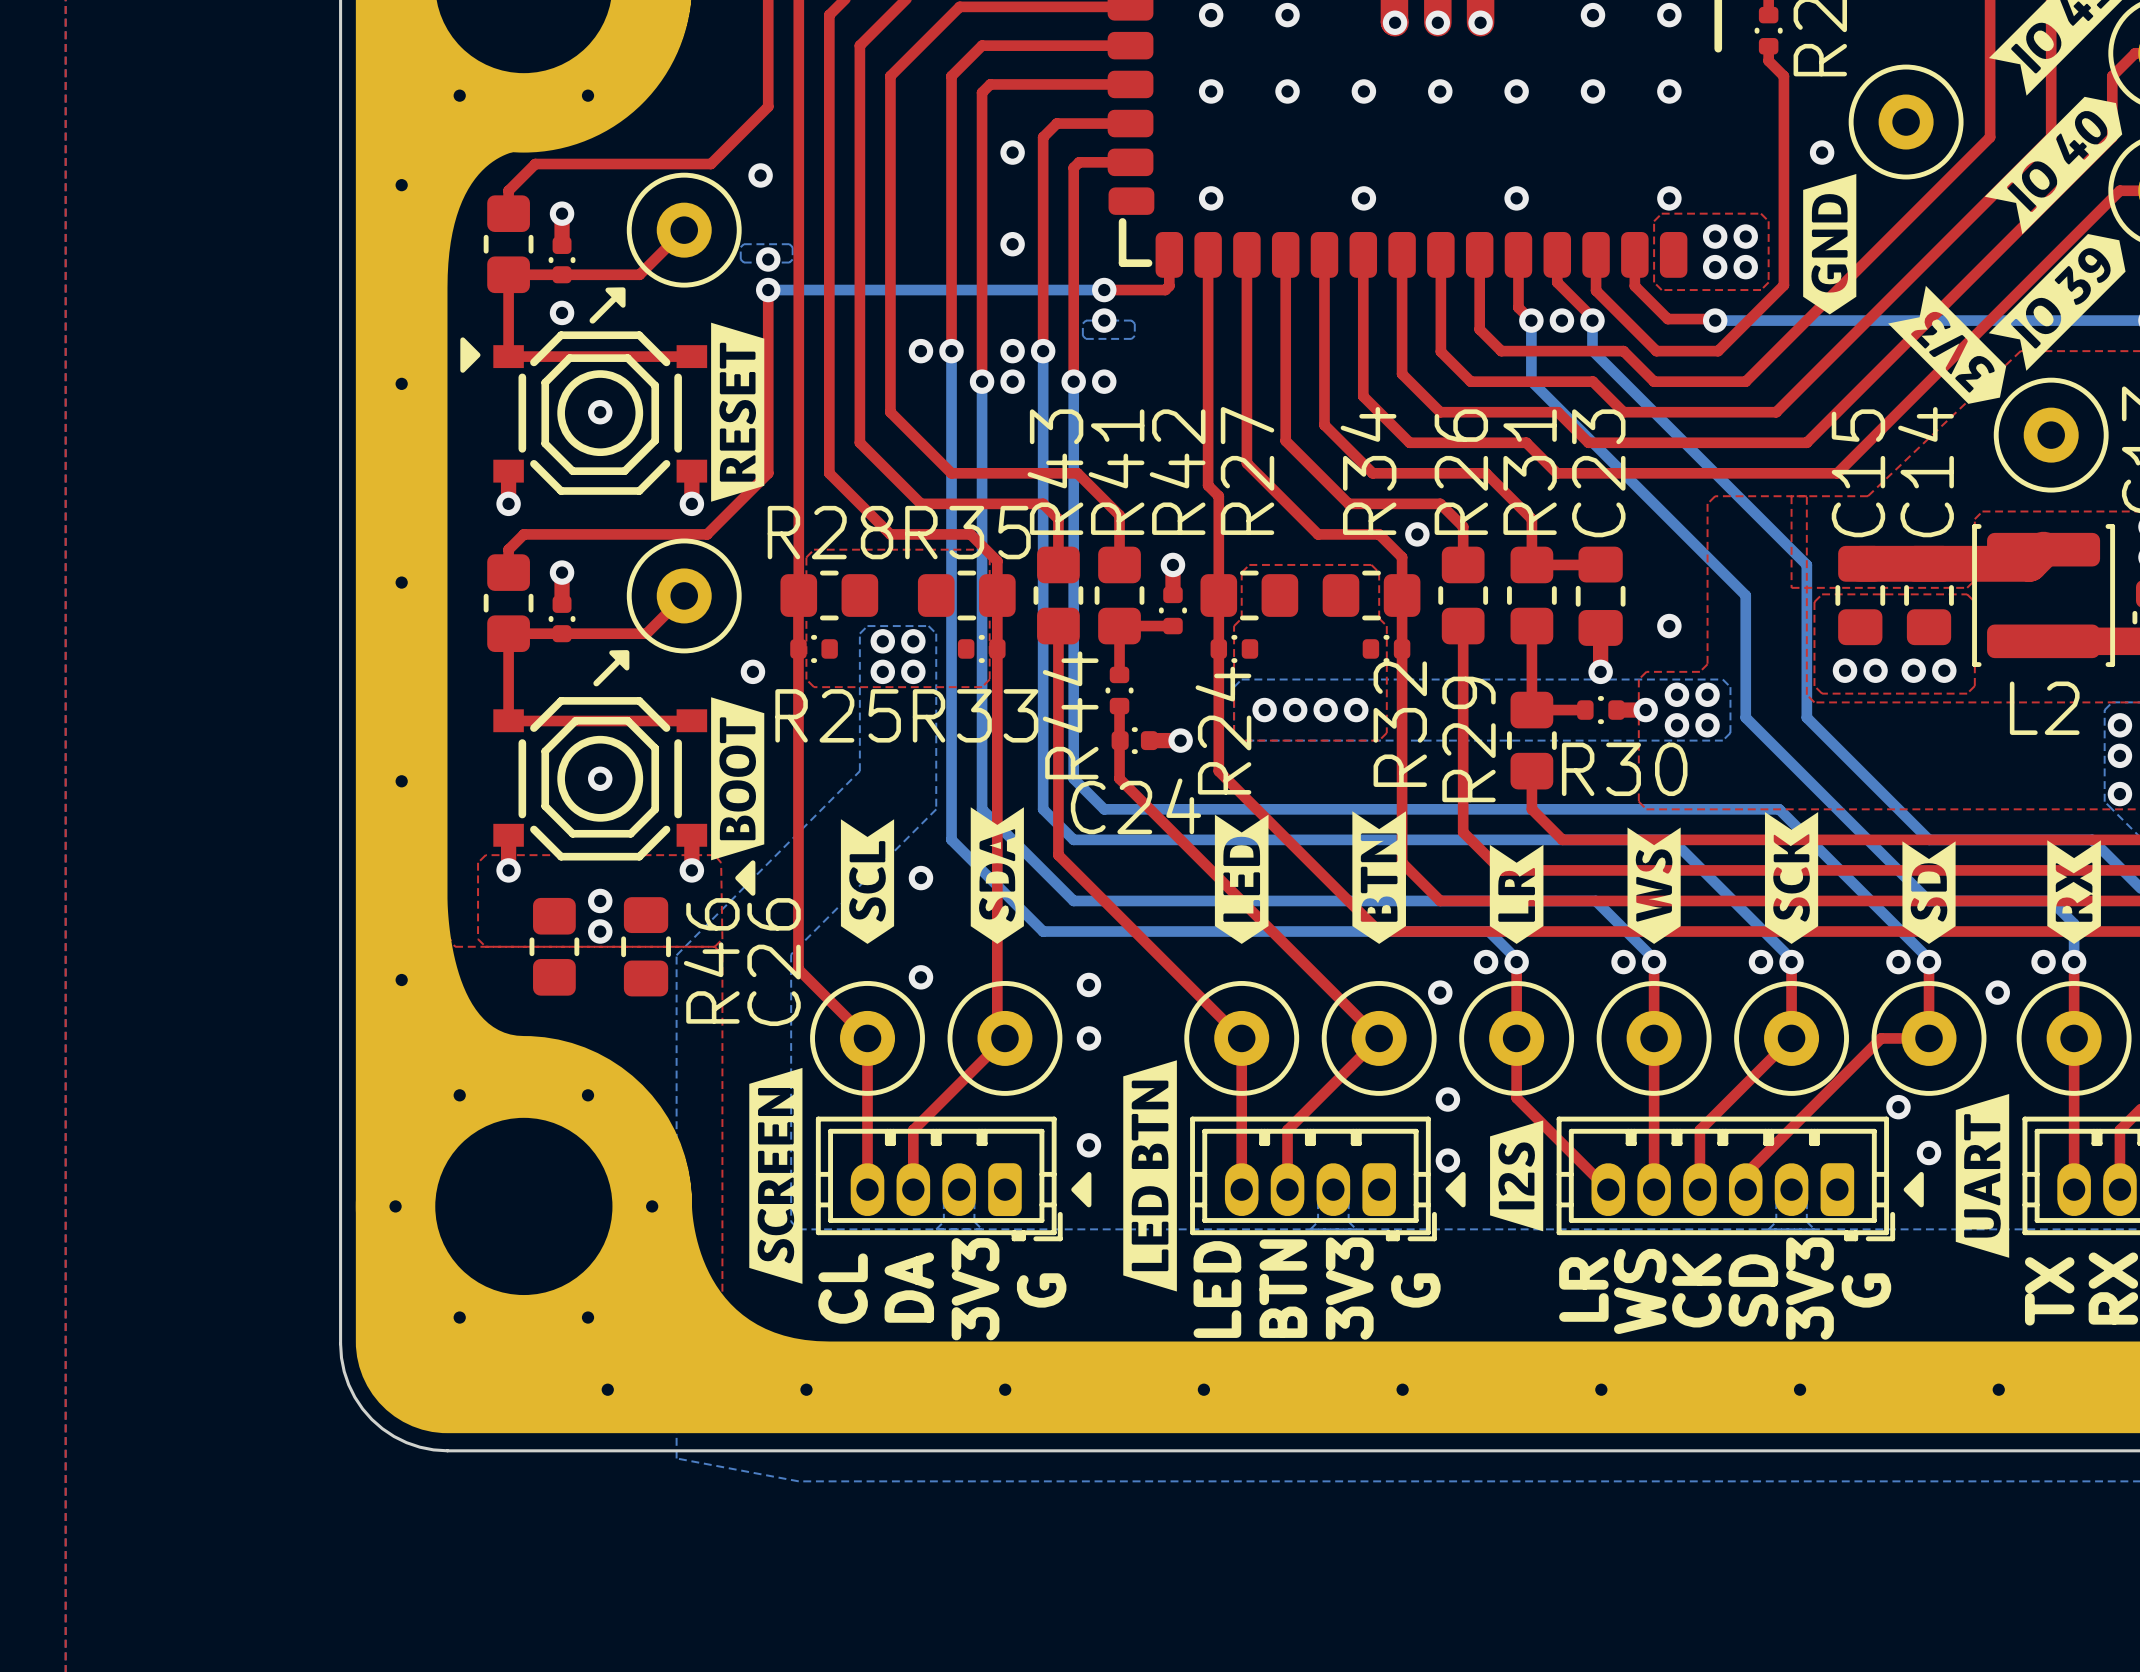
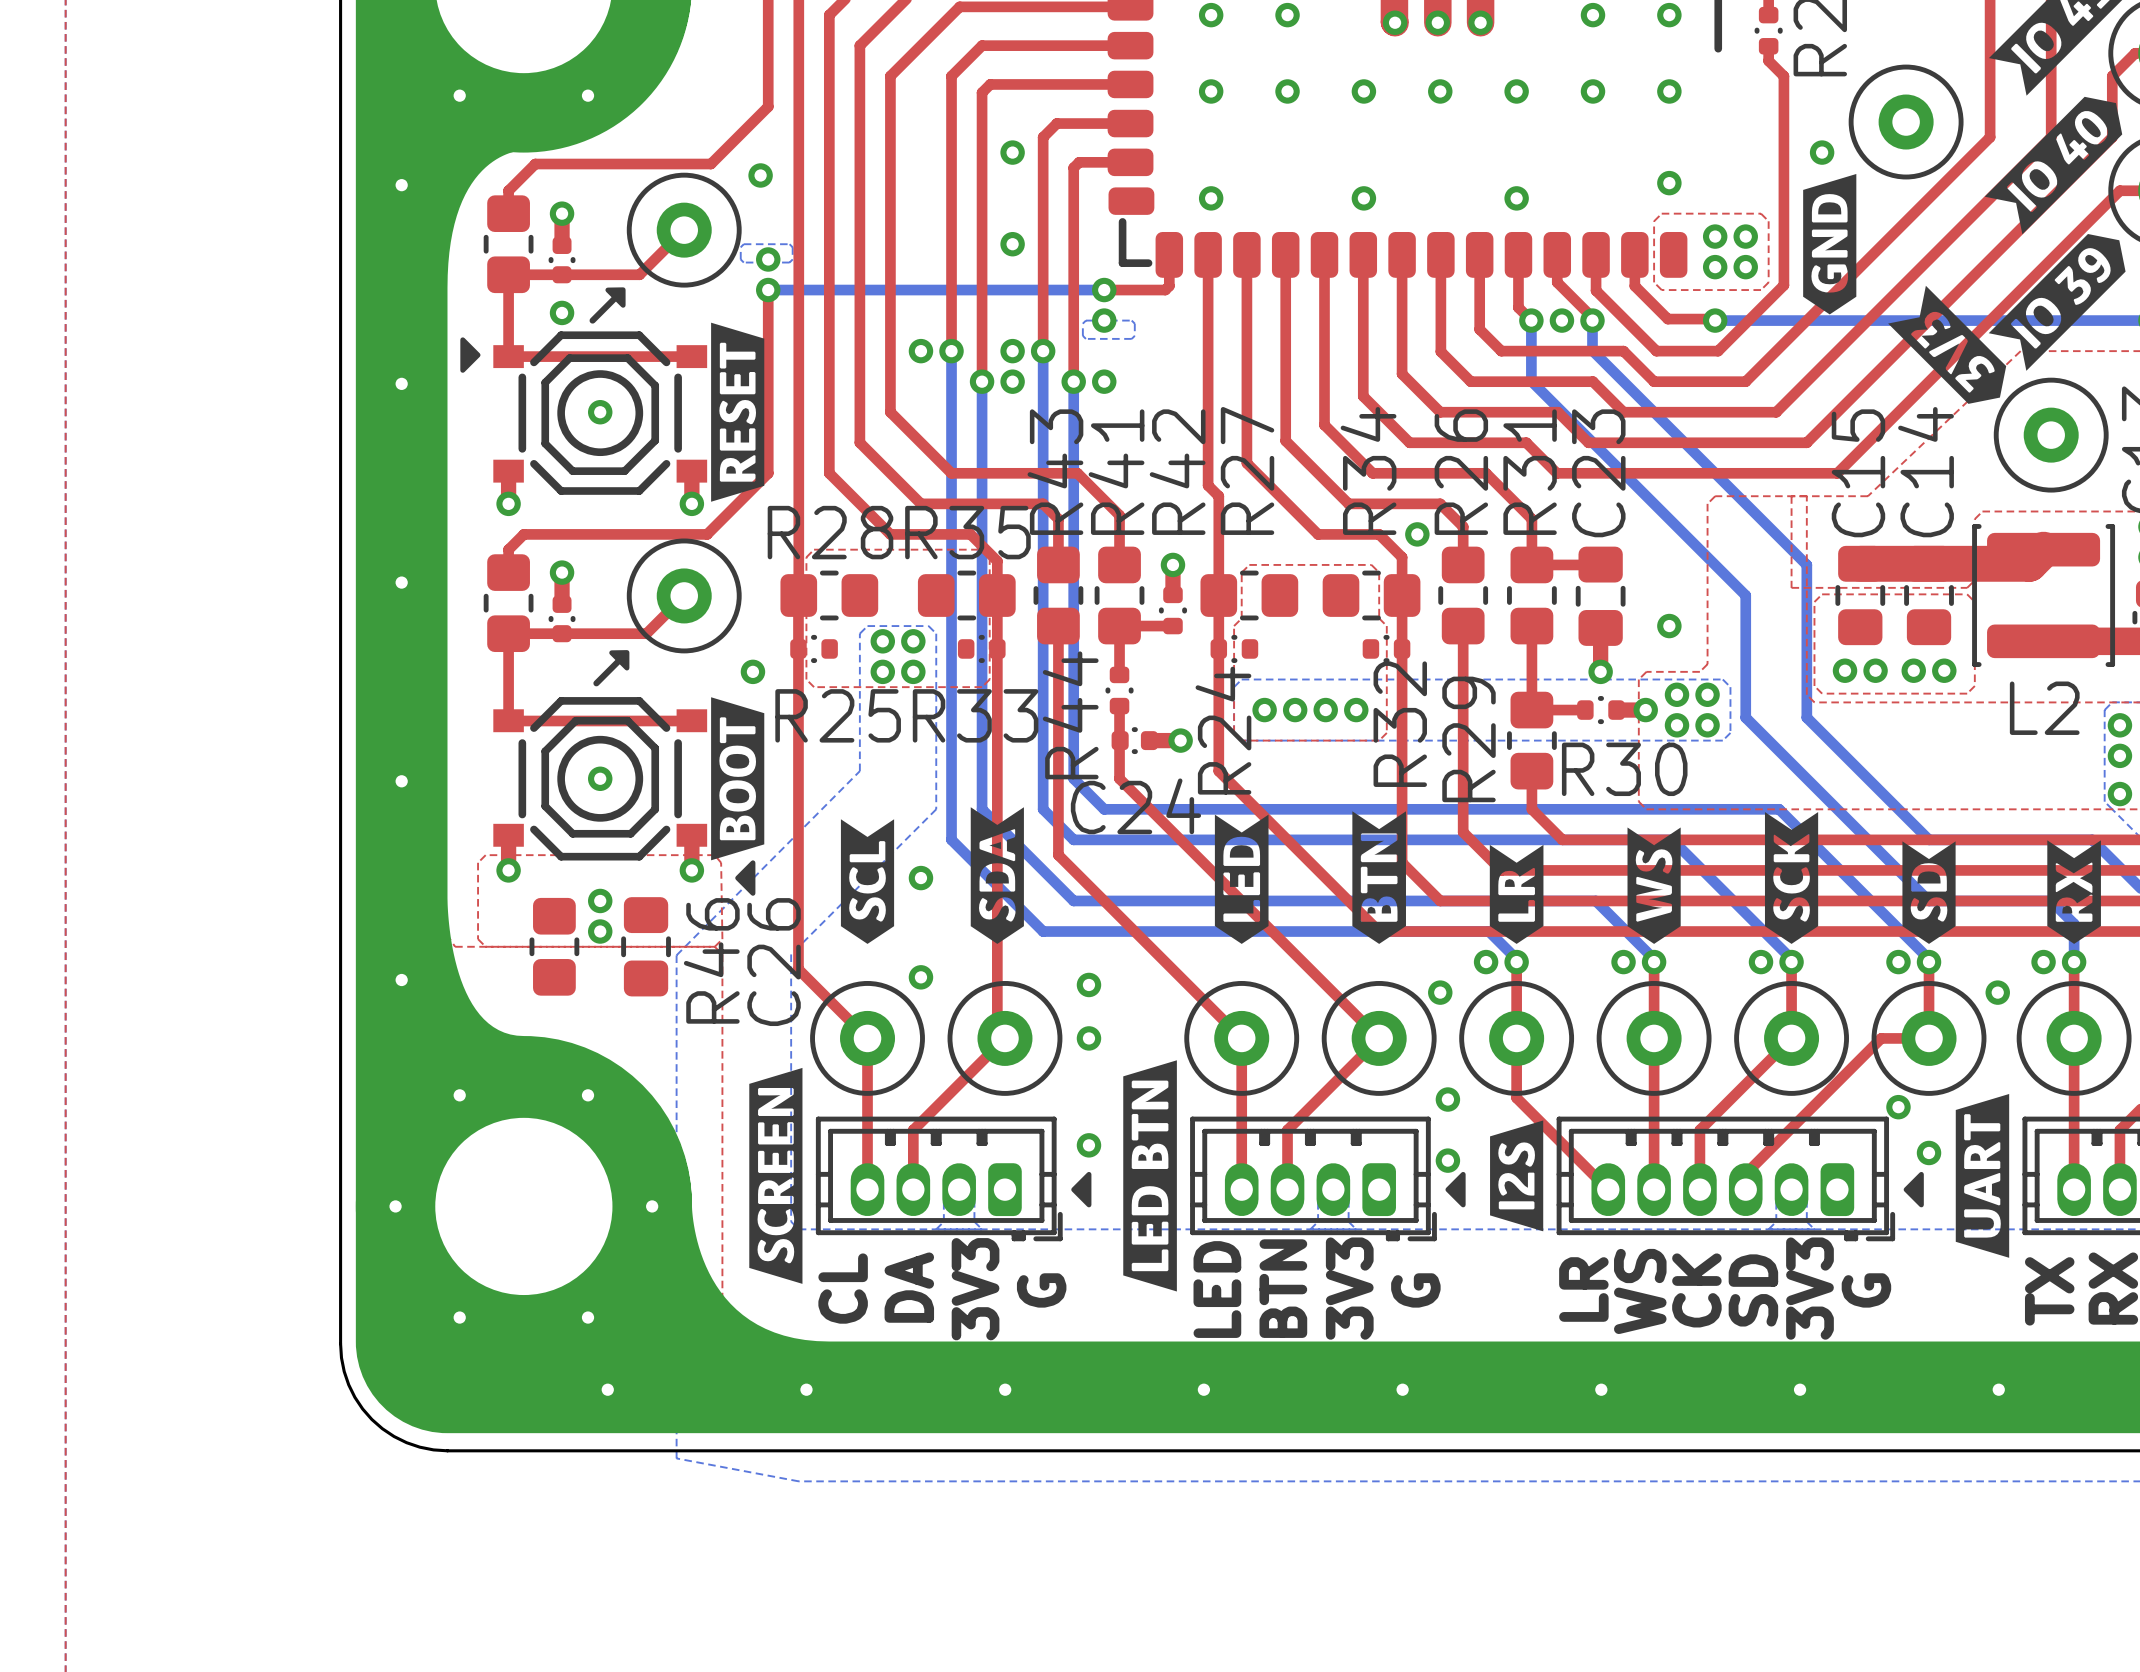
via position: (1669, 198) -> (1669, 183)

